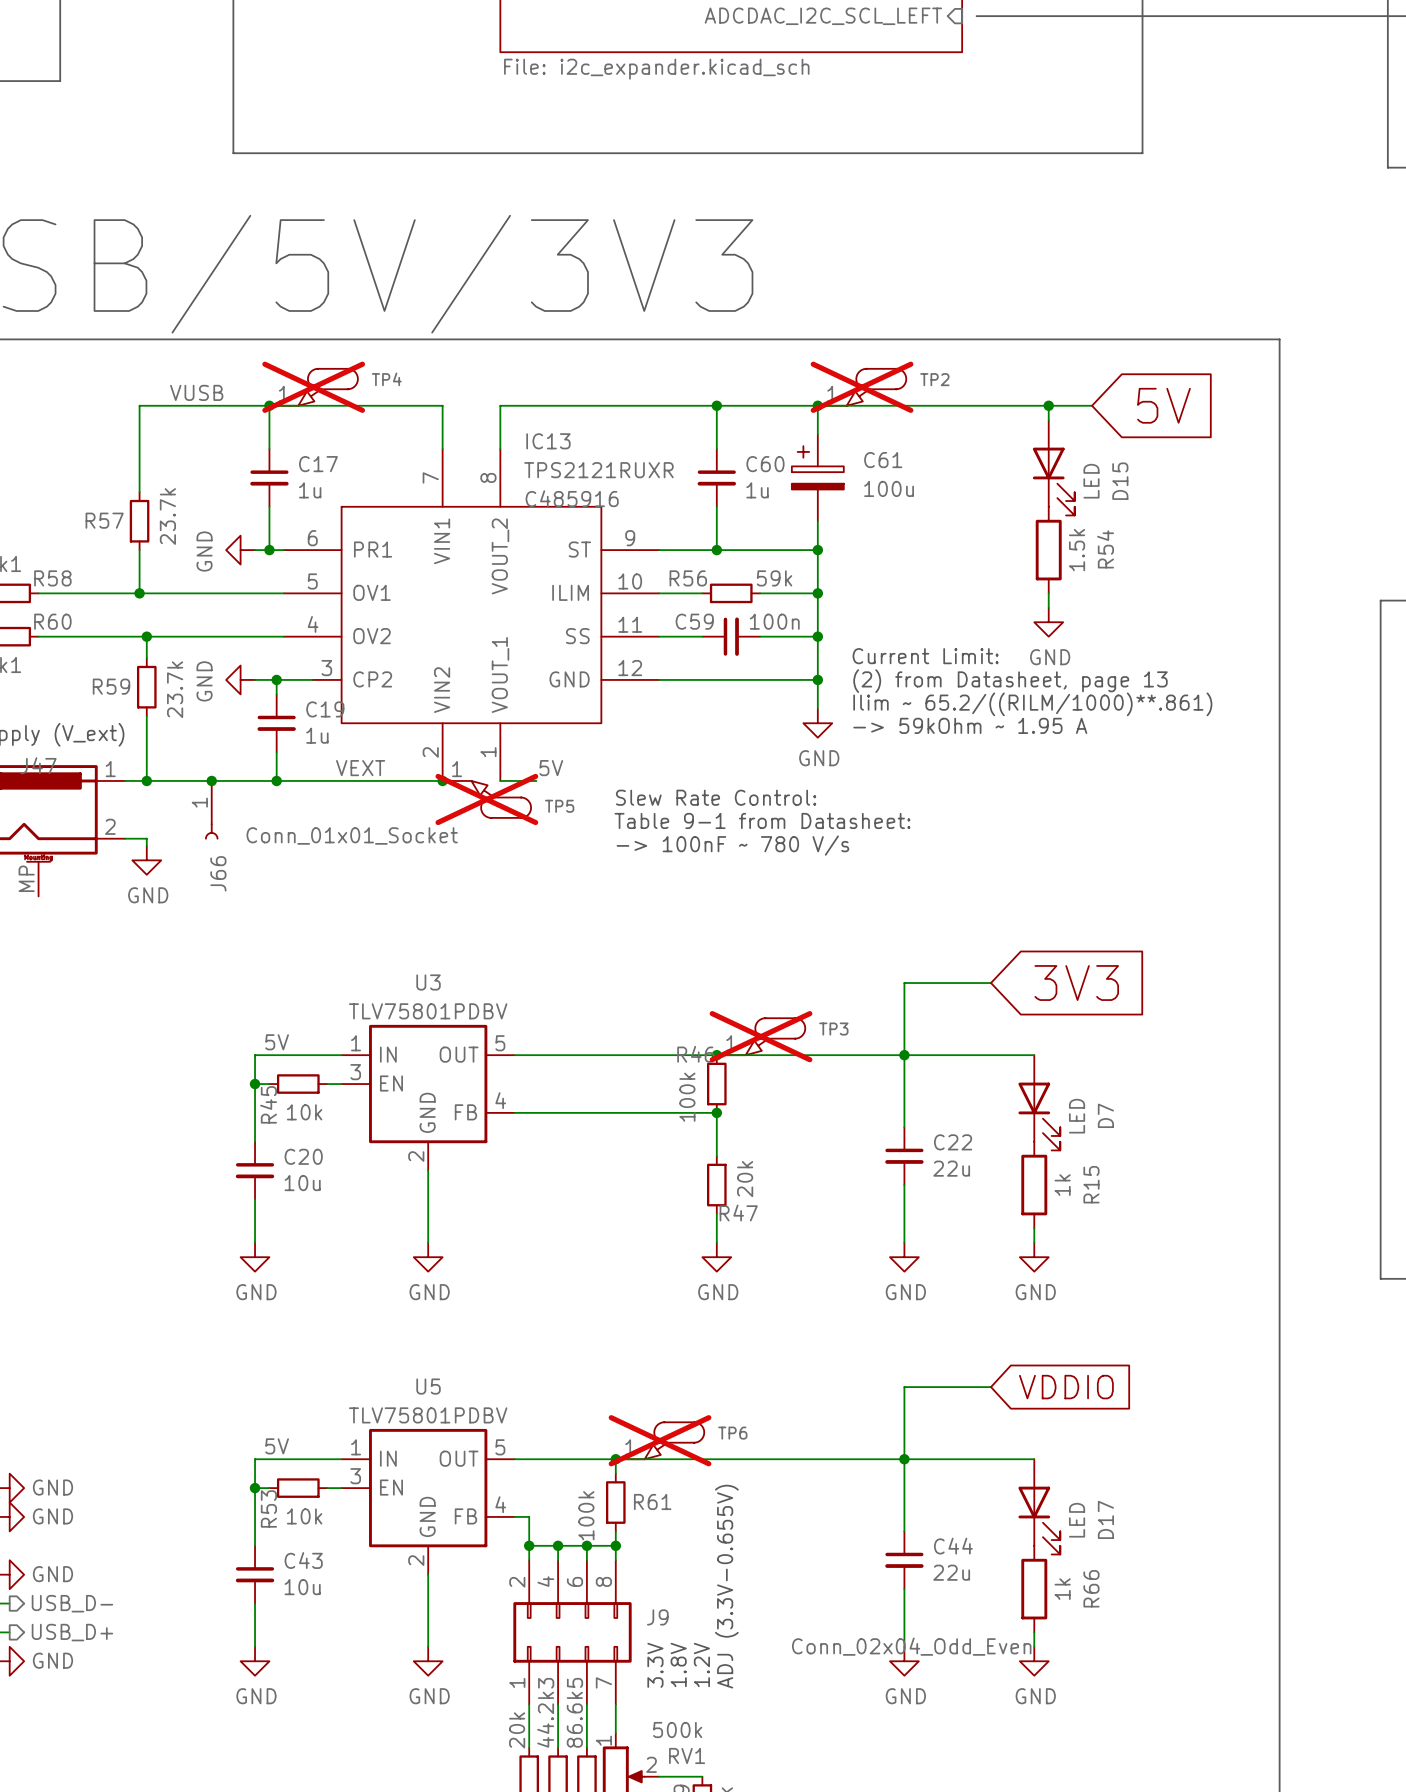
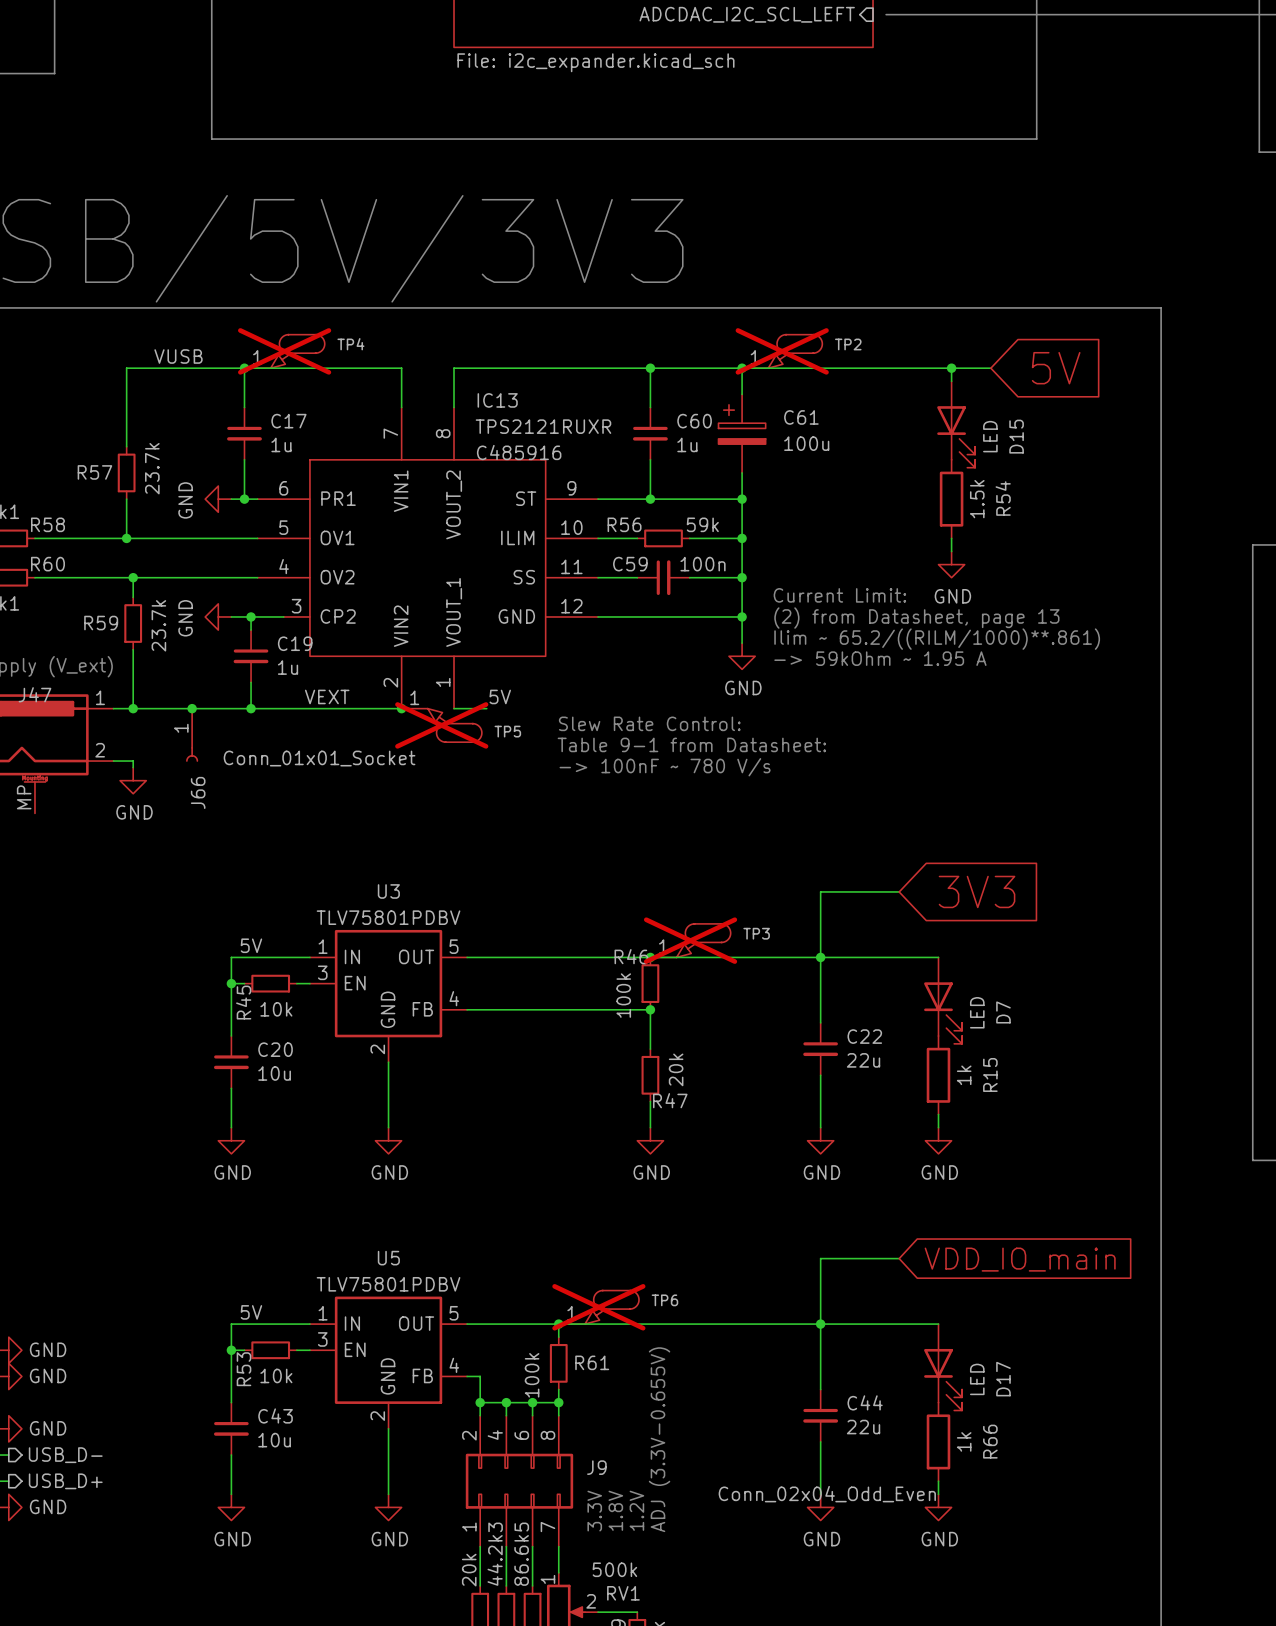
global label: VDDIO (1066, 1387) -> VDD_IO_main (1020, 1259)

